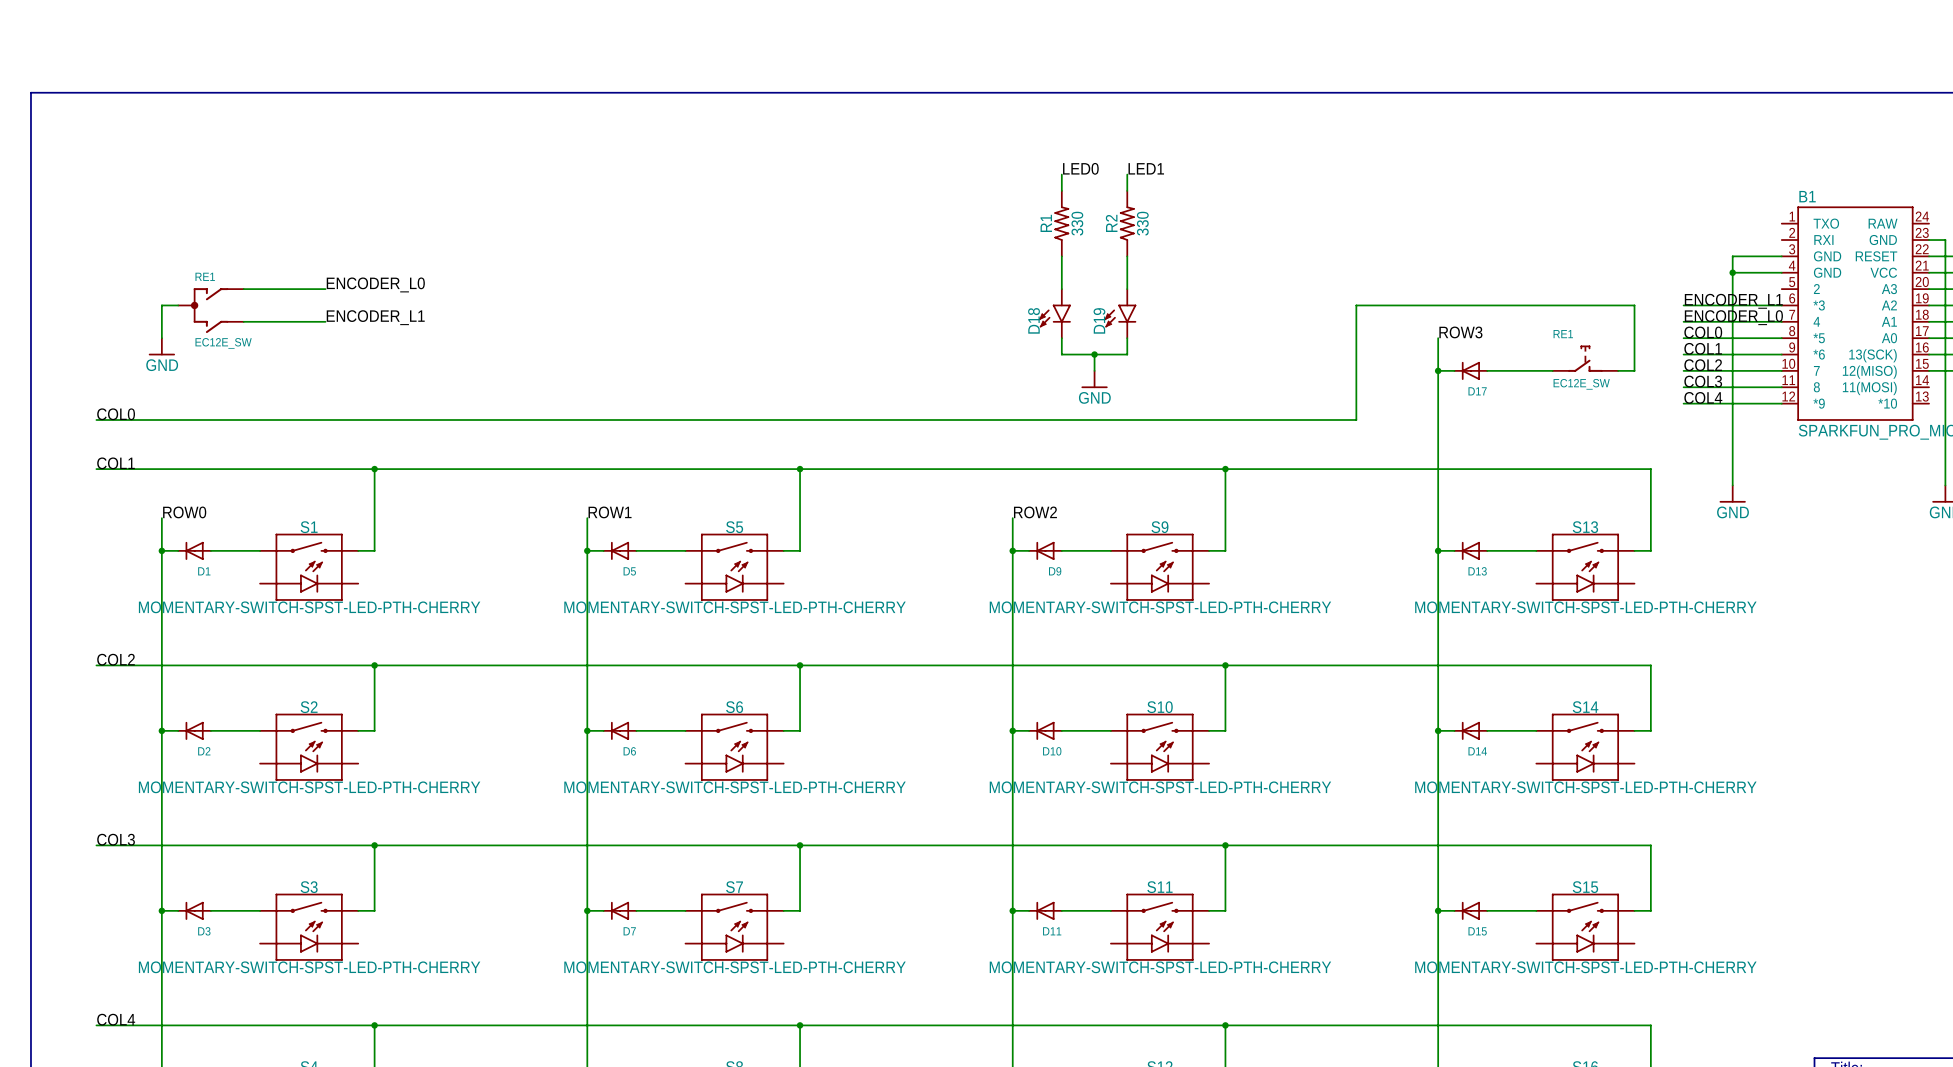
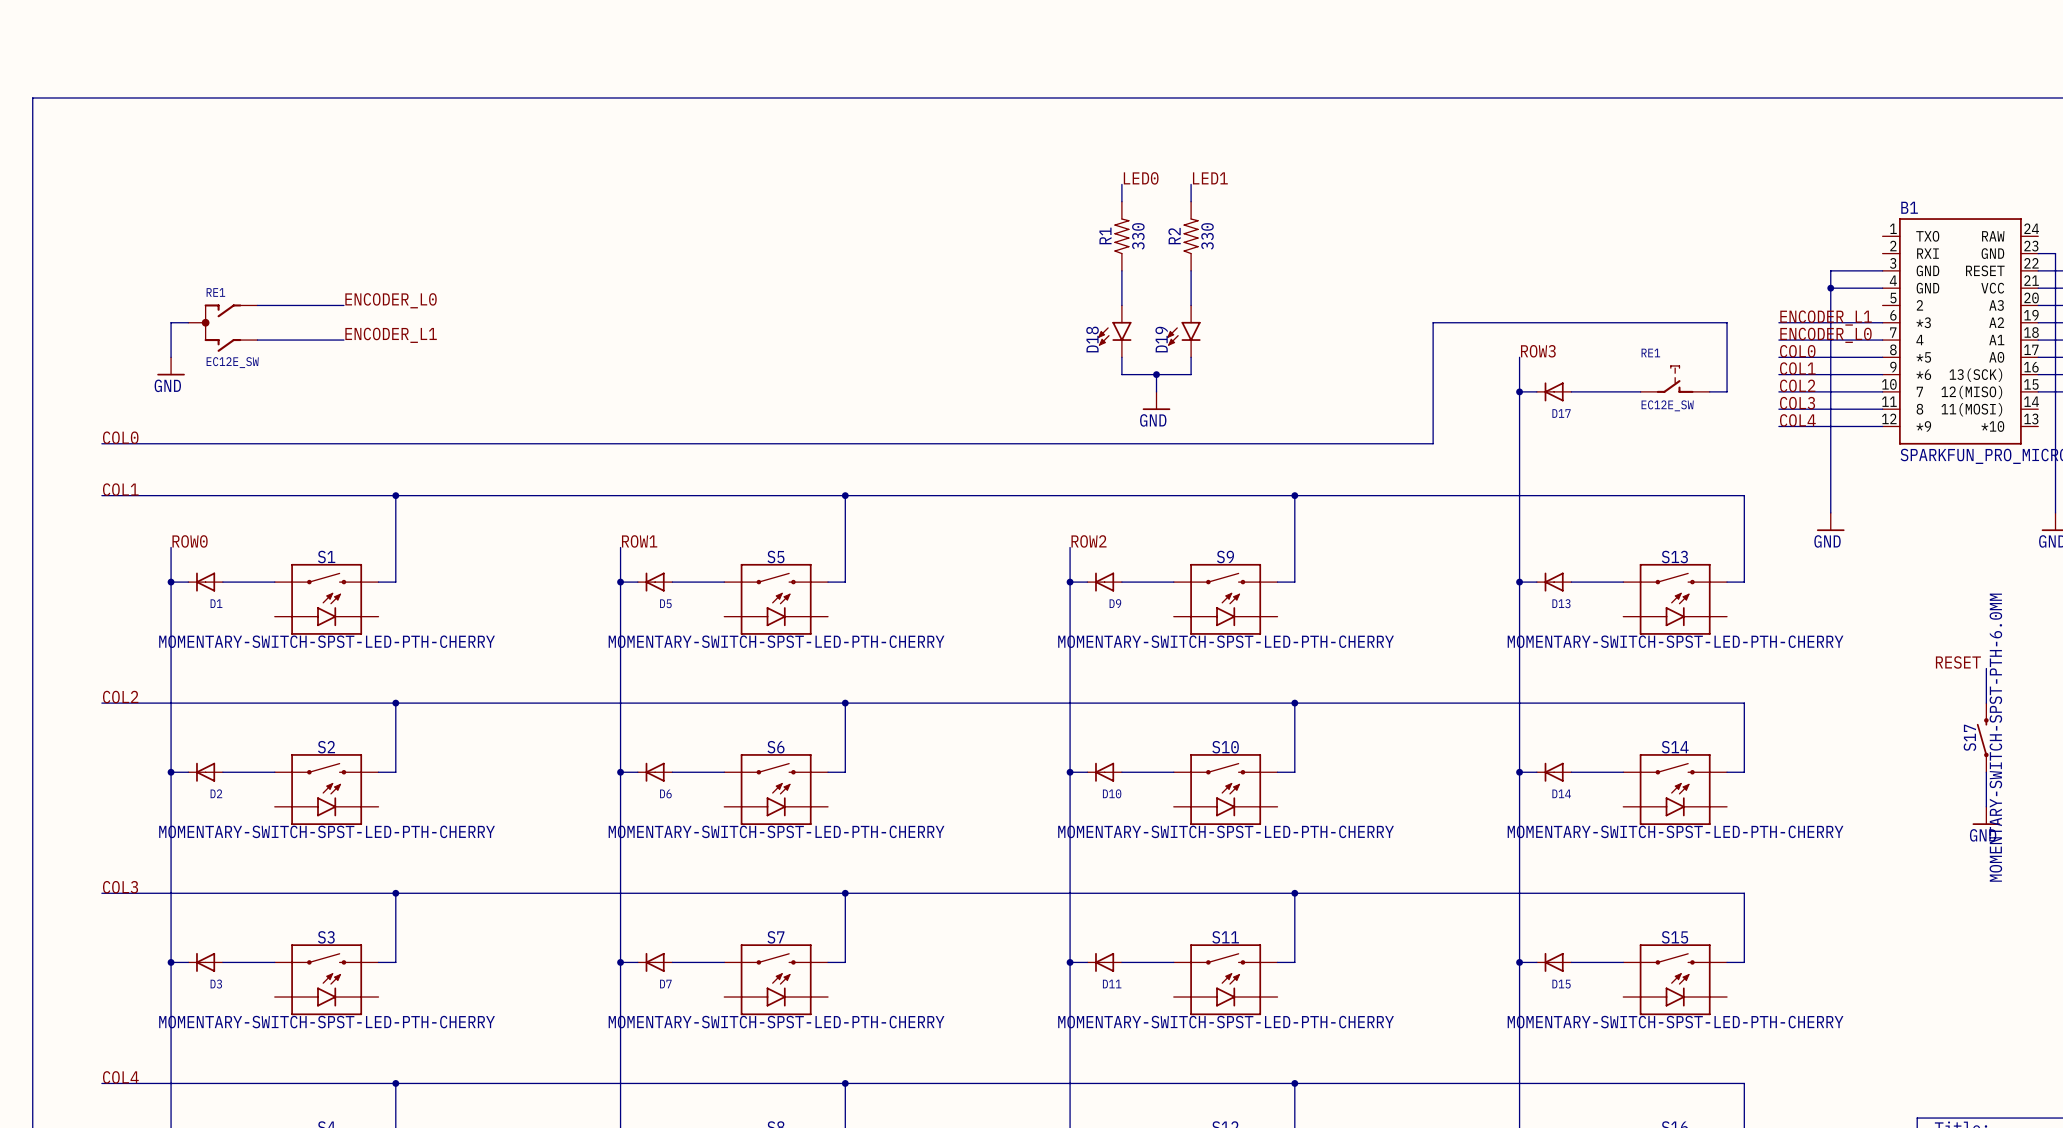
label: none -> RESET (1958, 662)
wire: none -> (1986, 668) (1986, 703)
S17: none -> MOMENTARY-SWITCH-SPST-PTH-6.0MM (1982, 737)
wire: none -> (1986, 772) (1986, 806)
power symbol: none -> GND (1986, 815)

